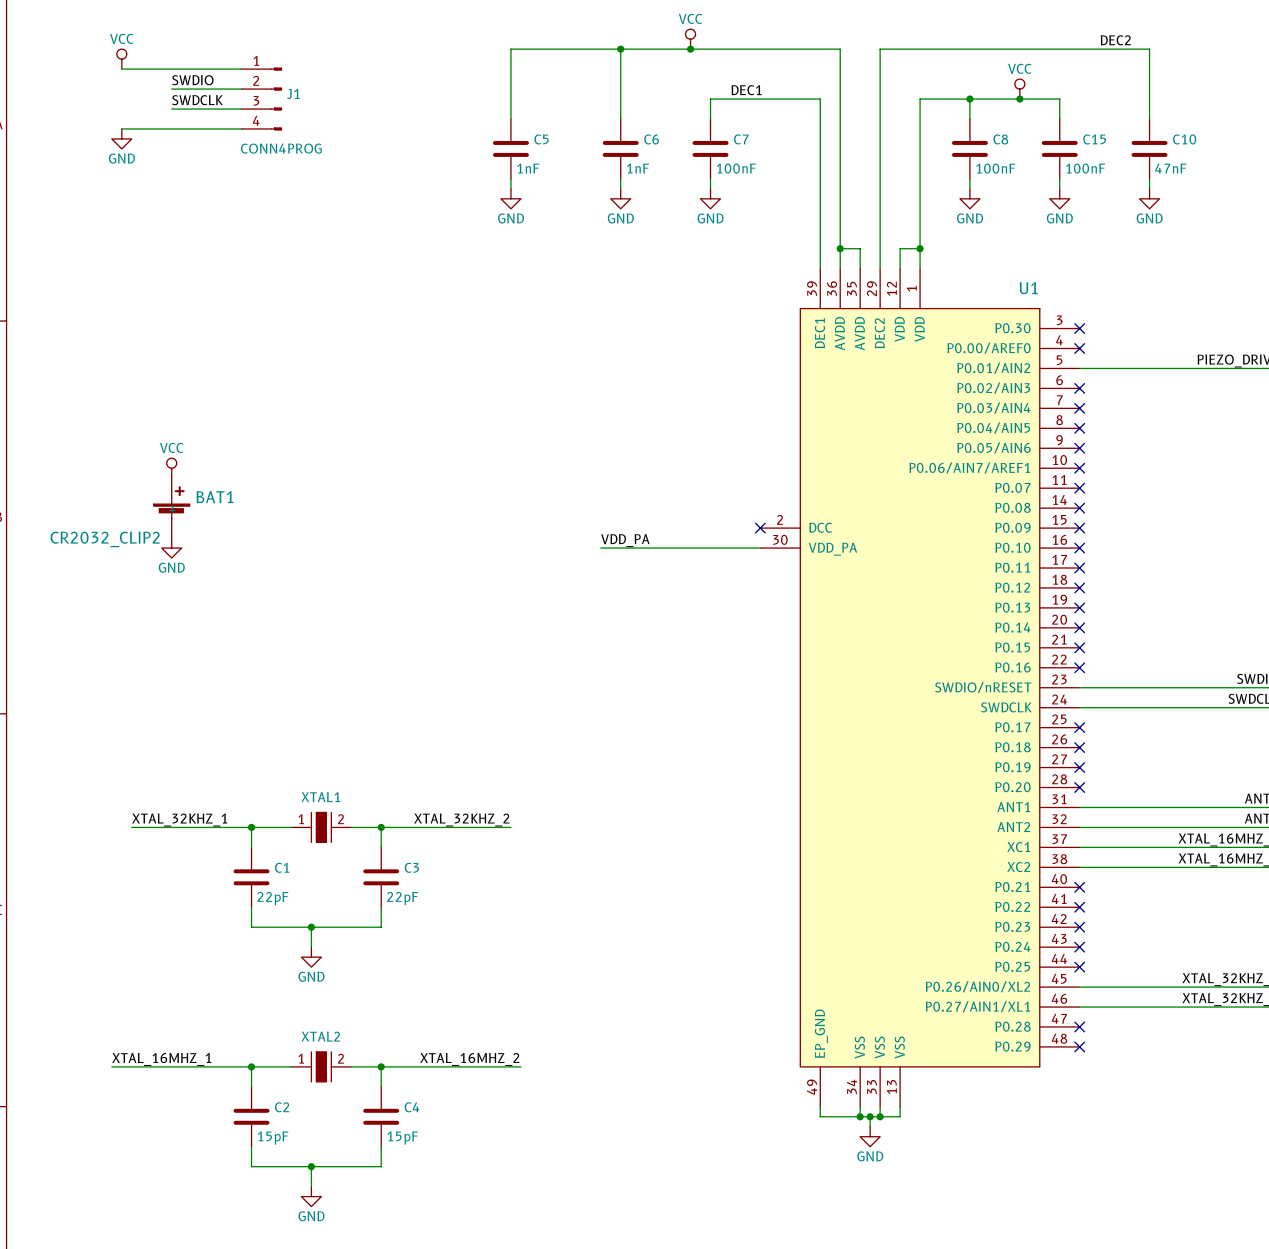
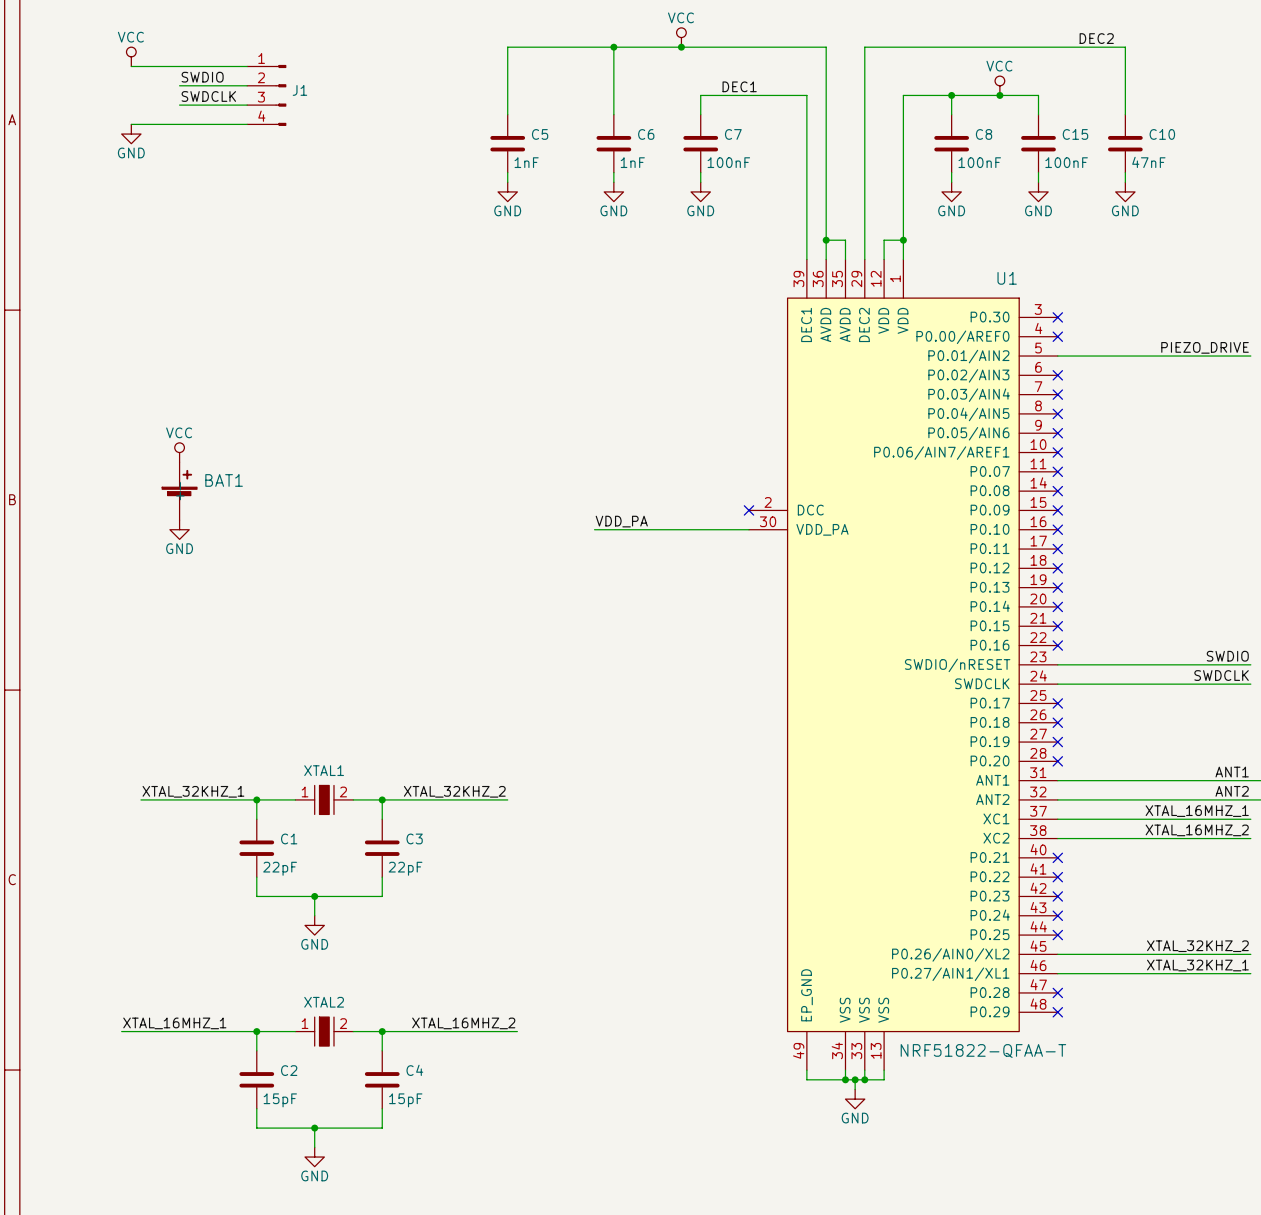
J1 value: CONN4PROG (281, 148) -> none
BAT1 value: CR2032_CLIP2 (105, 539) -> none
U1 text: none -> NRF51822-QFAA-T (983, 1050)

